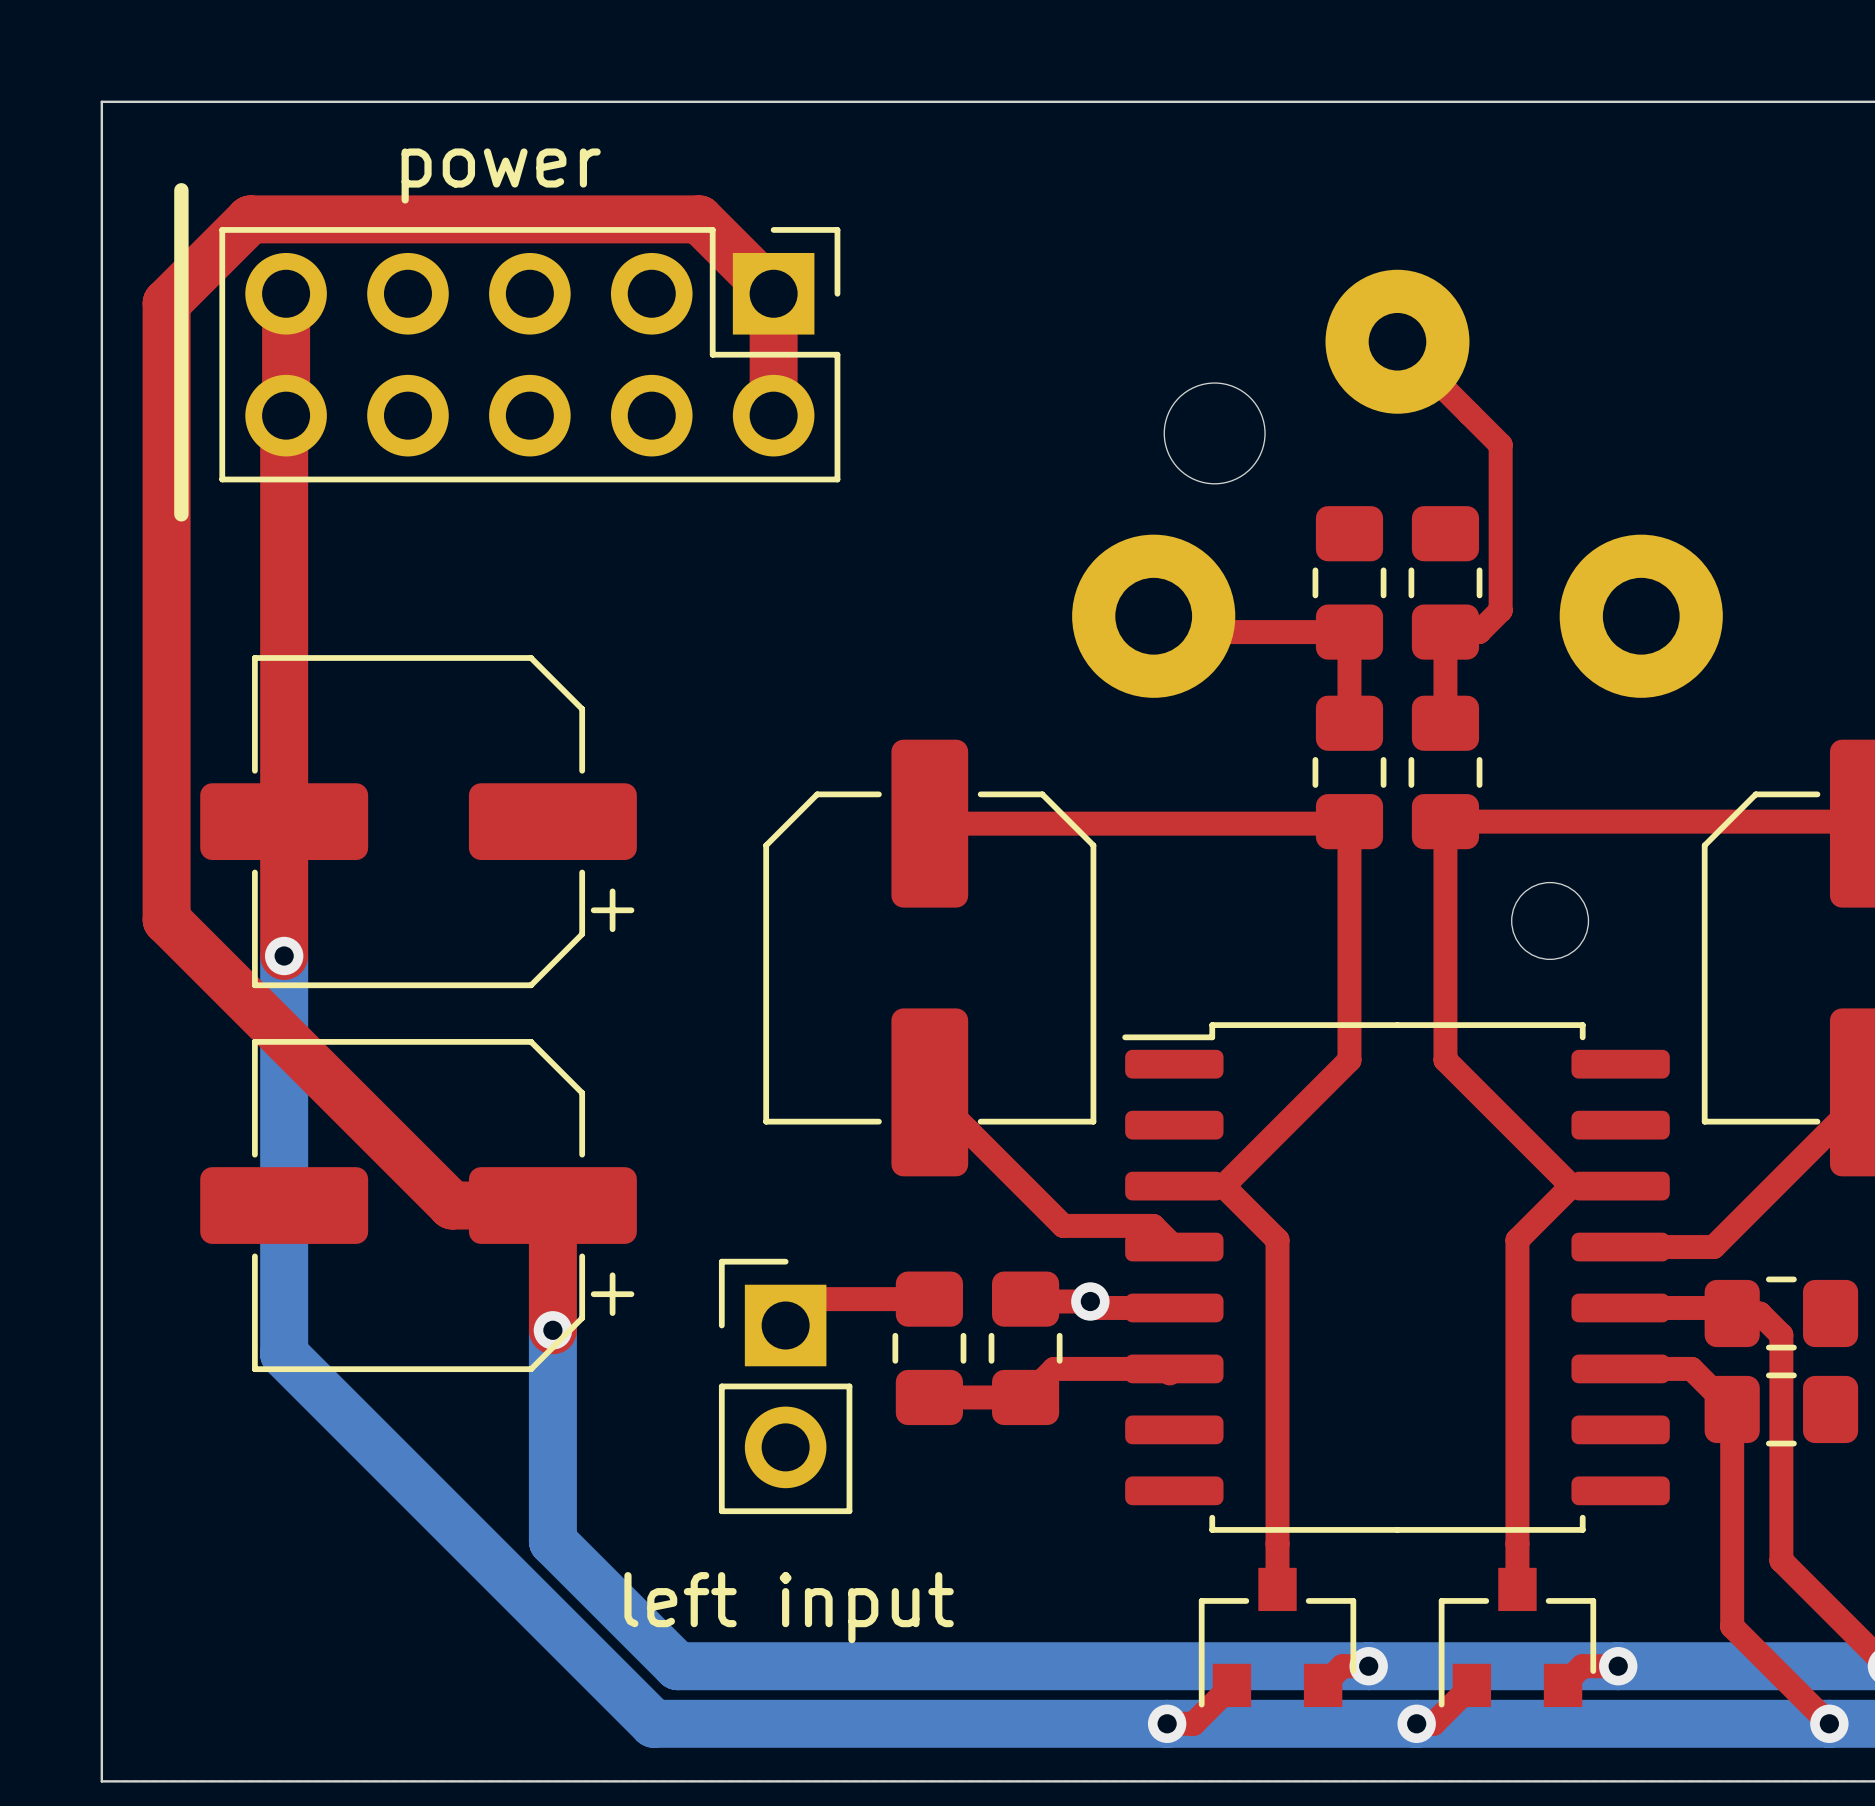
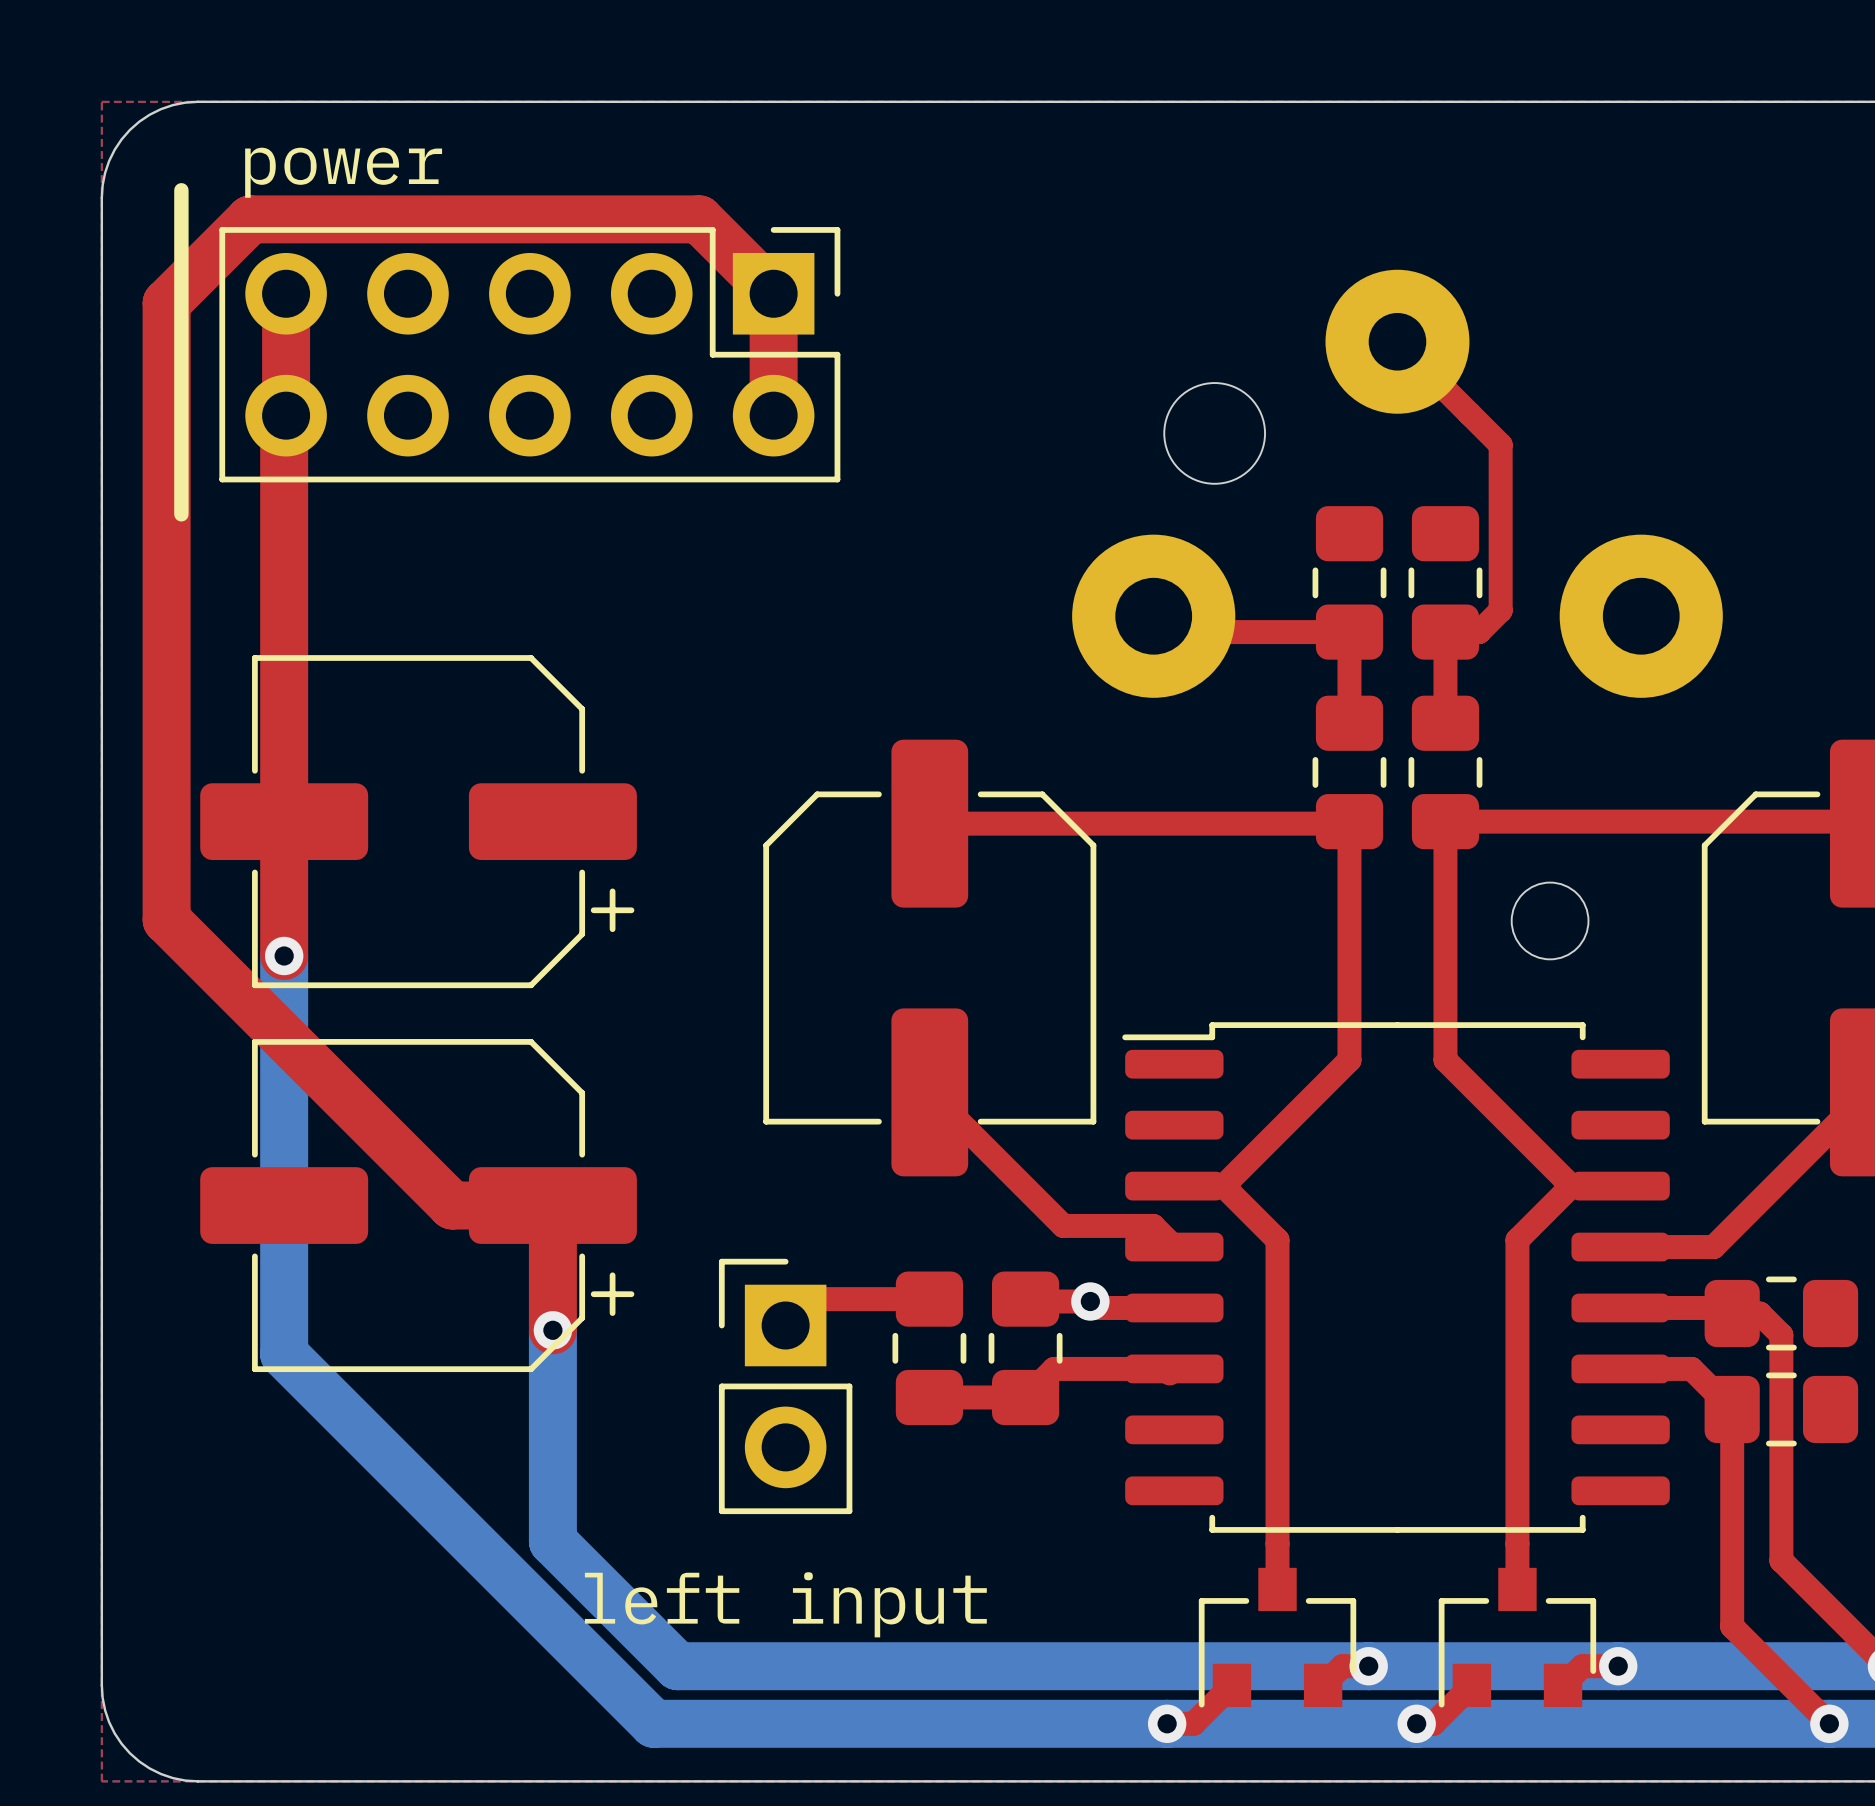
board edge: (197, 101) (101, 101) (101, 197) -> (197, 101) (172, 105) (161, 109) (149, 114) (129, 129) (114, 149) (109, 161) (105, 172) (101, 197)
text position: power (501, 176) -> power (343, 172)
board edge: (101, 1685) (101, 1781) (197, 1781) -> (101, 1685) (105, 1710) (109, 1722) (114, 1733) (129, 1753) (139, 1761) (161, 1774) (185, 1780) (197, 1781)

